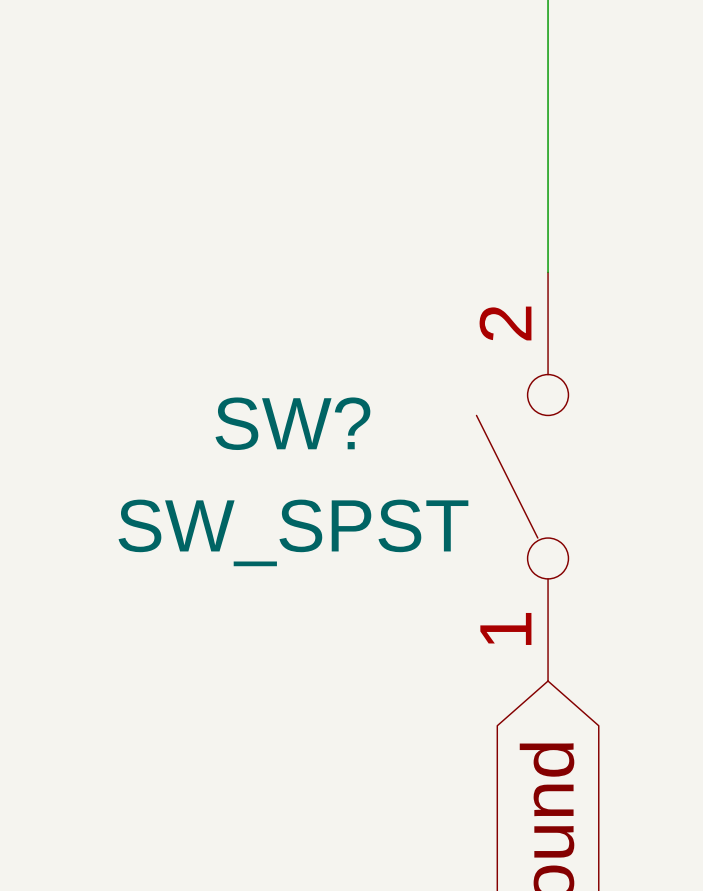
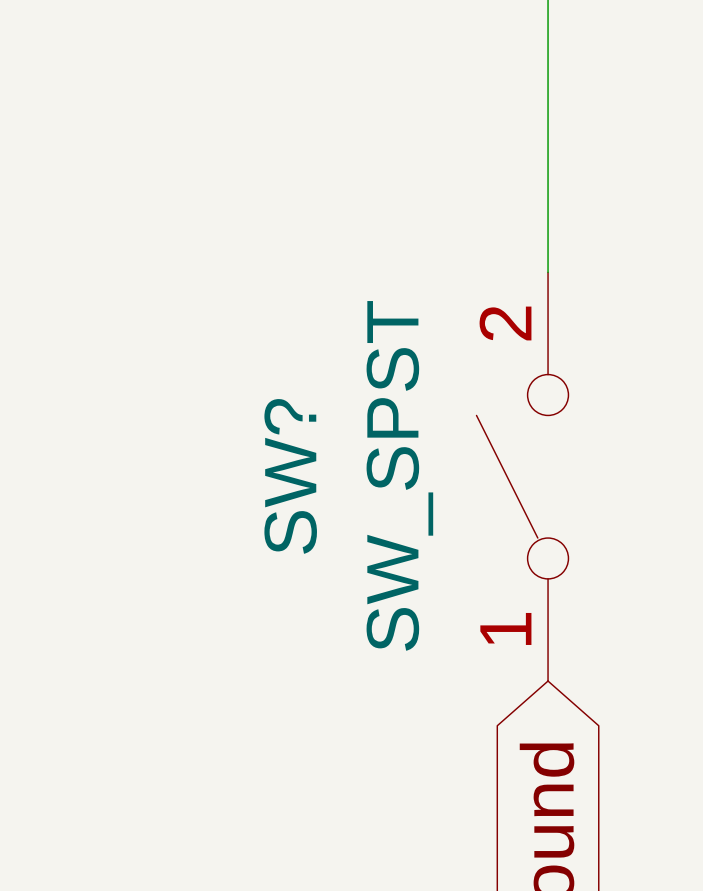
SW? name rotation: 0° (292, 423) -> 90° counterclockwise (290, 476)
SW? value rotation: 0° (293, 532) -> 90° counterclockwise (399, 475)

